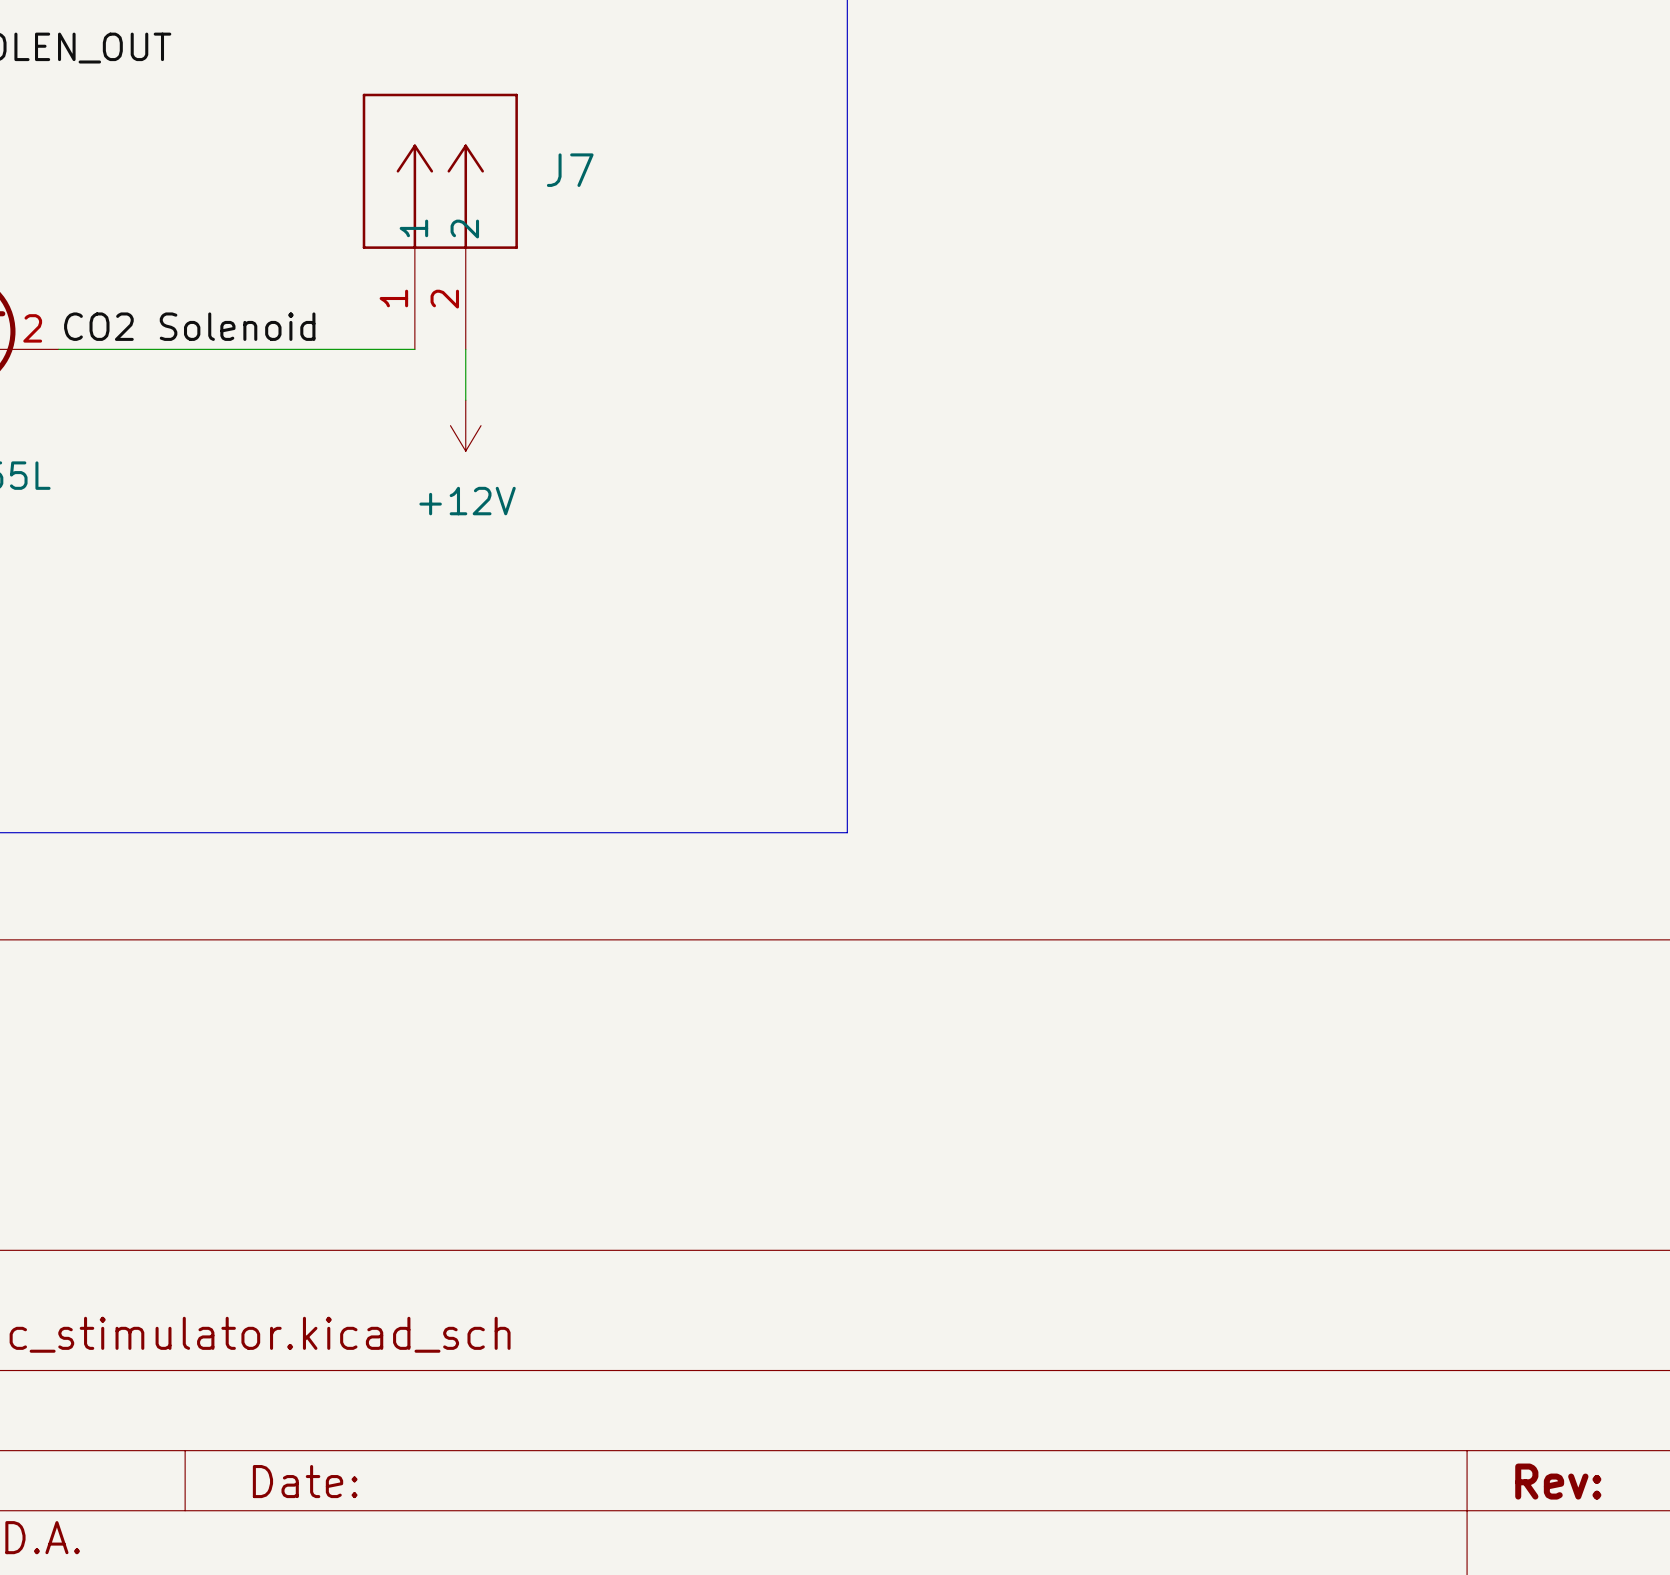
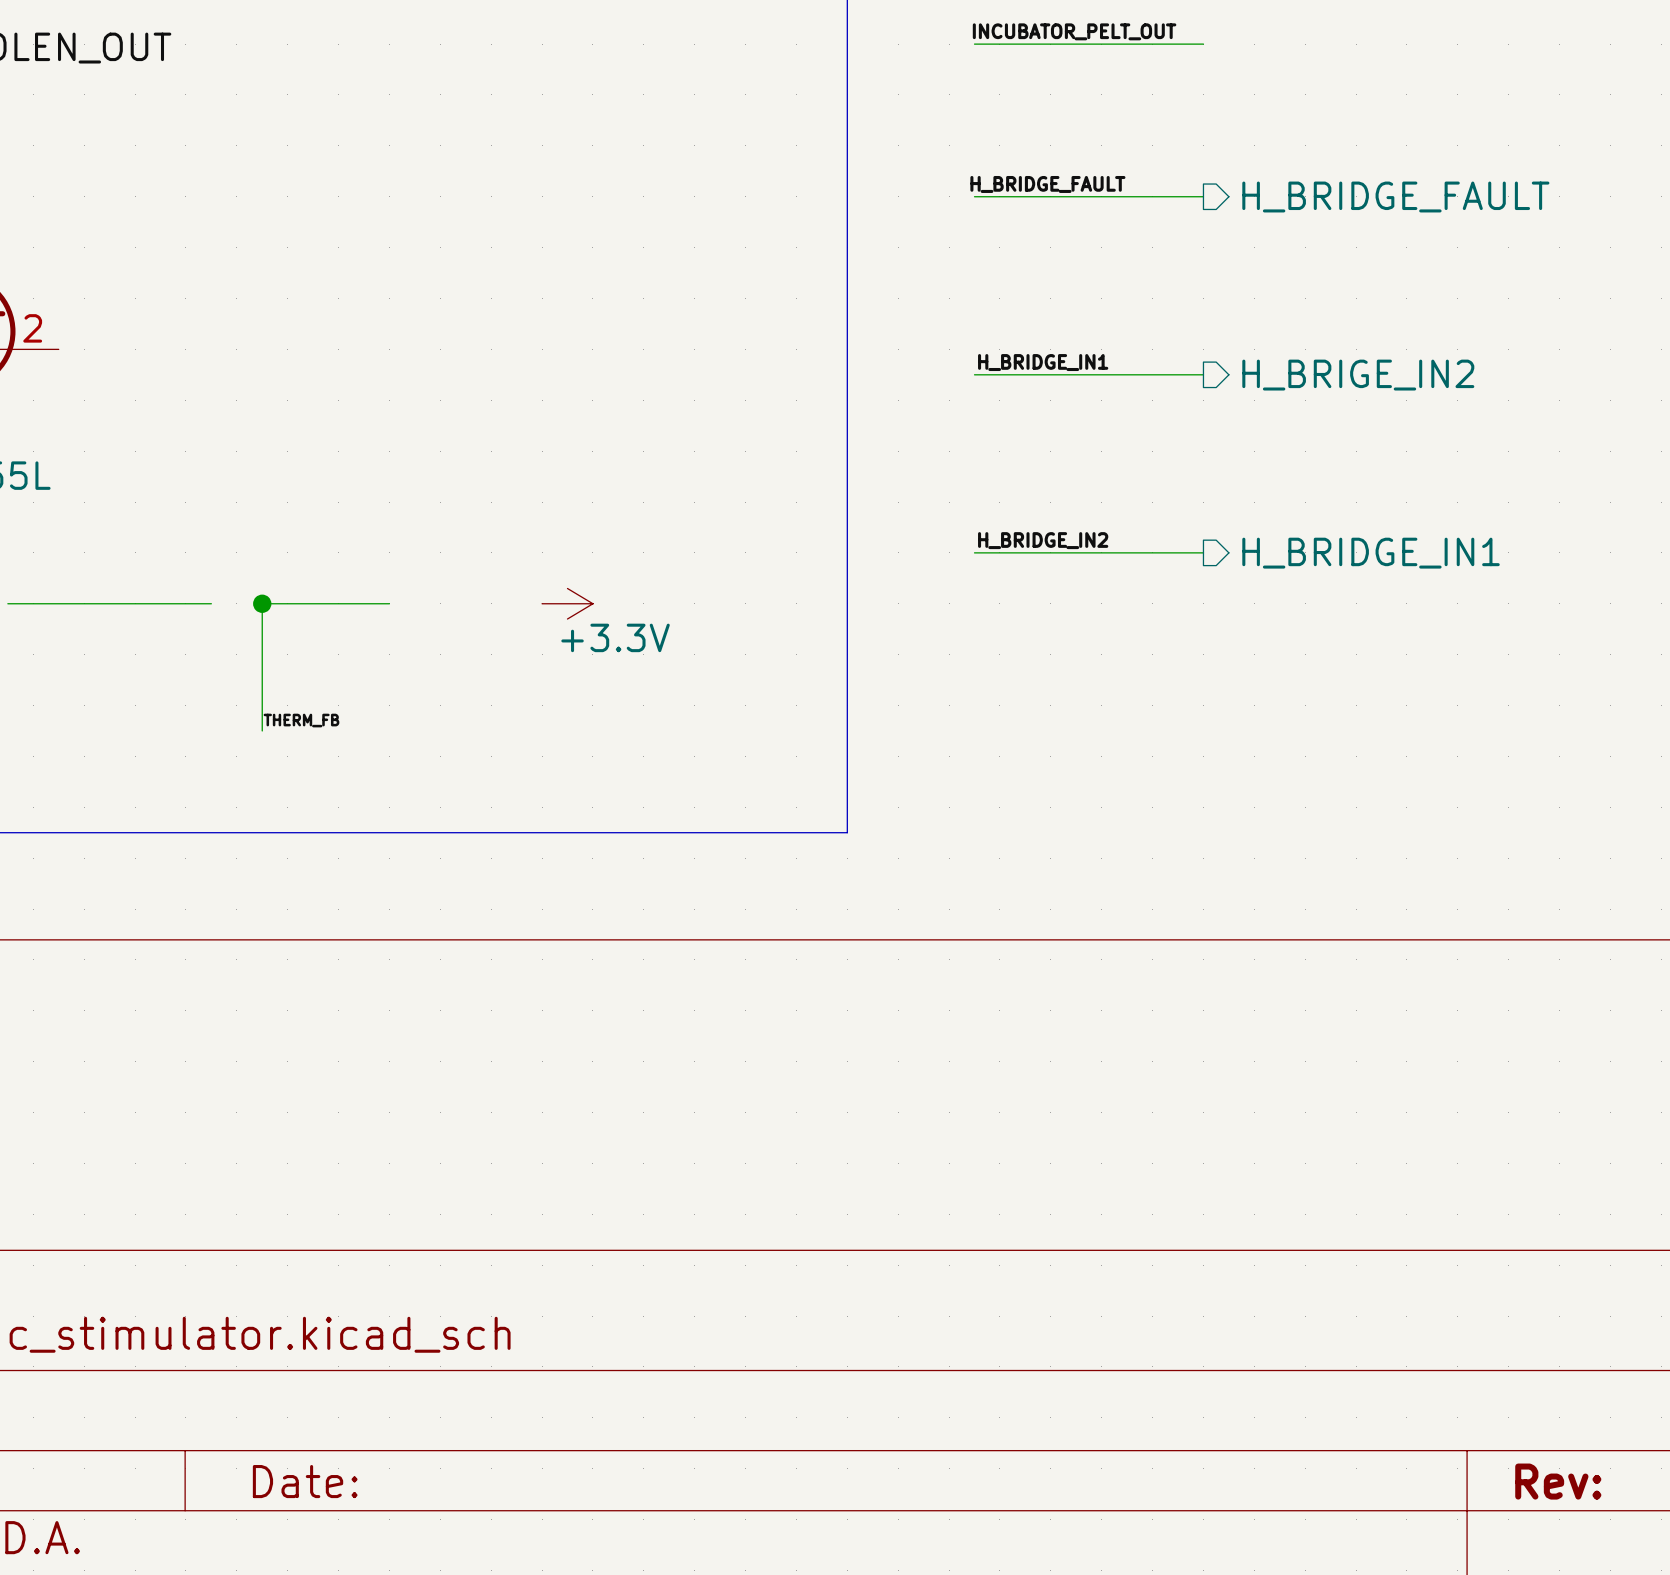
label: none -> INCUBATOR_PELT_OUT (1074, 31)
wire: none -> (974, 44) (1203, 44)
label: none -> H_BRIDGE_FAULT (1047, 184)
wire: none -> (974, 196) (1203, 196)
sheet pin: none -> H_BRIDGE_FAULT (1395, 197)
J7: (440, 221) -> none
label: CO2 Solenoid (189, 326) -> none
wire: (58, 349) (414, 349) -> none
wire: (465, 349) (465, 400) -> none
label: none -> H_BRIDGE_IN1 (1043, 362)
wire: none -> (974, 374) (1203, 374)
sheet pin: none -> H_BRIGE_IN2 (1358, 375)
power symbol: +12V (465, 425) -> none
label: none -> H_BRIDGE_IN2 (1043, 540)
wire: none -> (974, 552) (1203, 552)
sheet pin: none -> H_BRIDGE_IN1 (1371, 553)
wire: none -> (7, 603) (211, 603)
junction: none -> (262, 603)
wire: none -> (389, 603) (262, 603) (262, 730)
power symbol: none -> +3.3V (567, 603)
label: none -> THERM_FB (301, 720)

